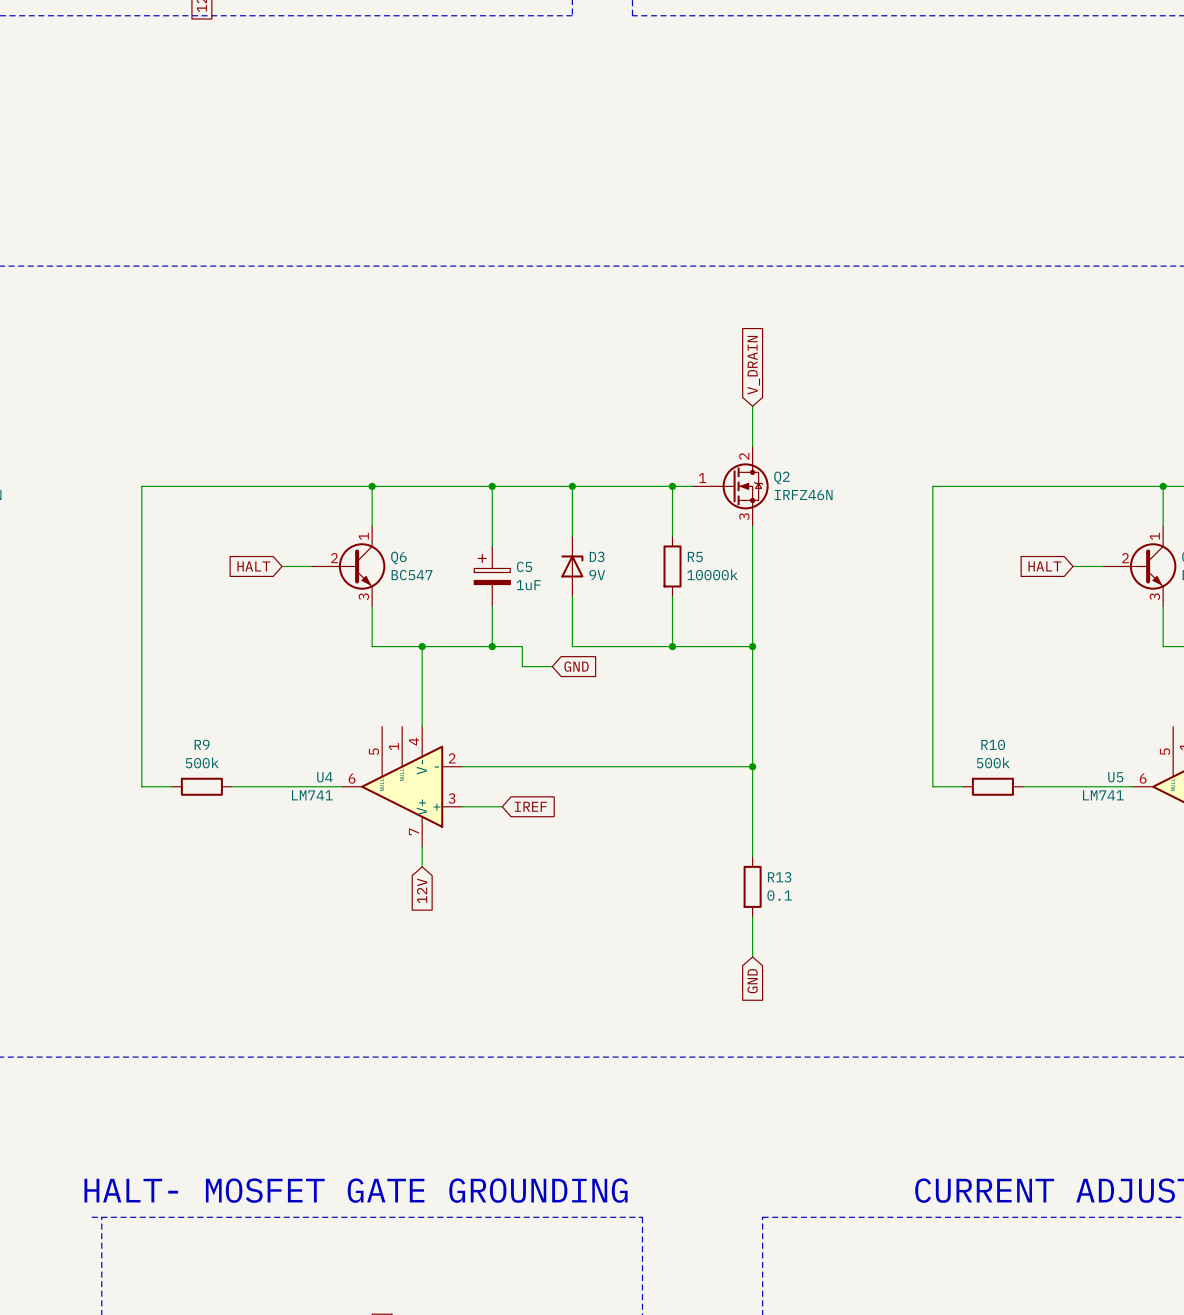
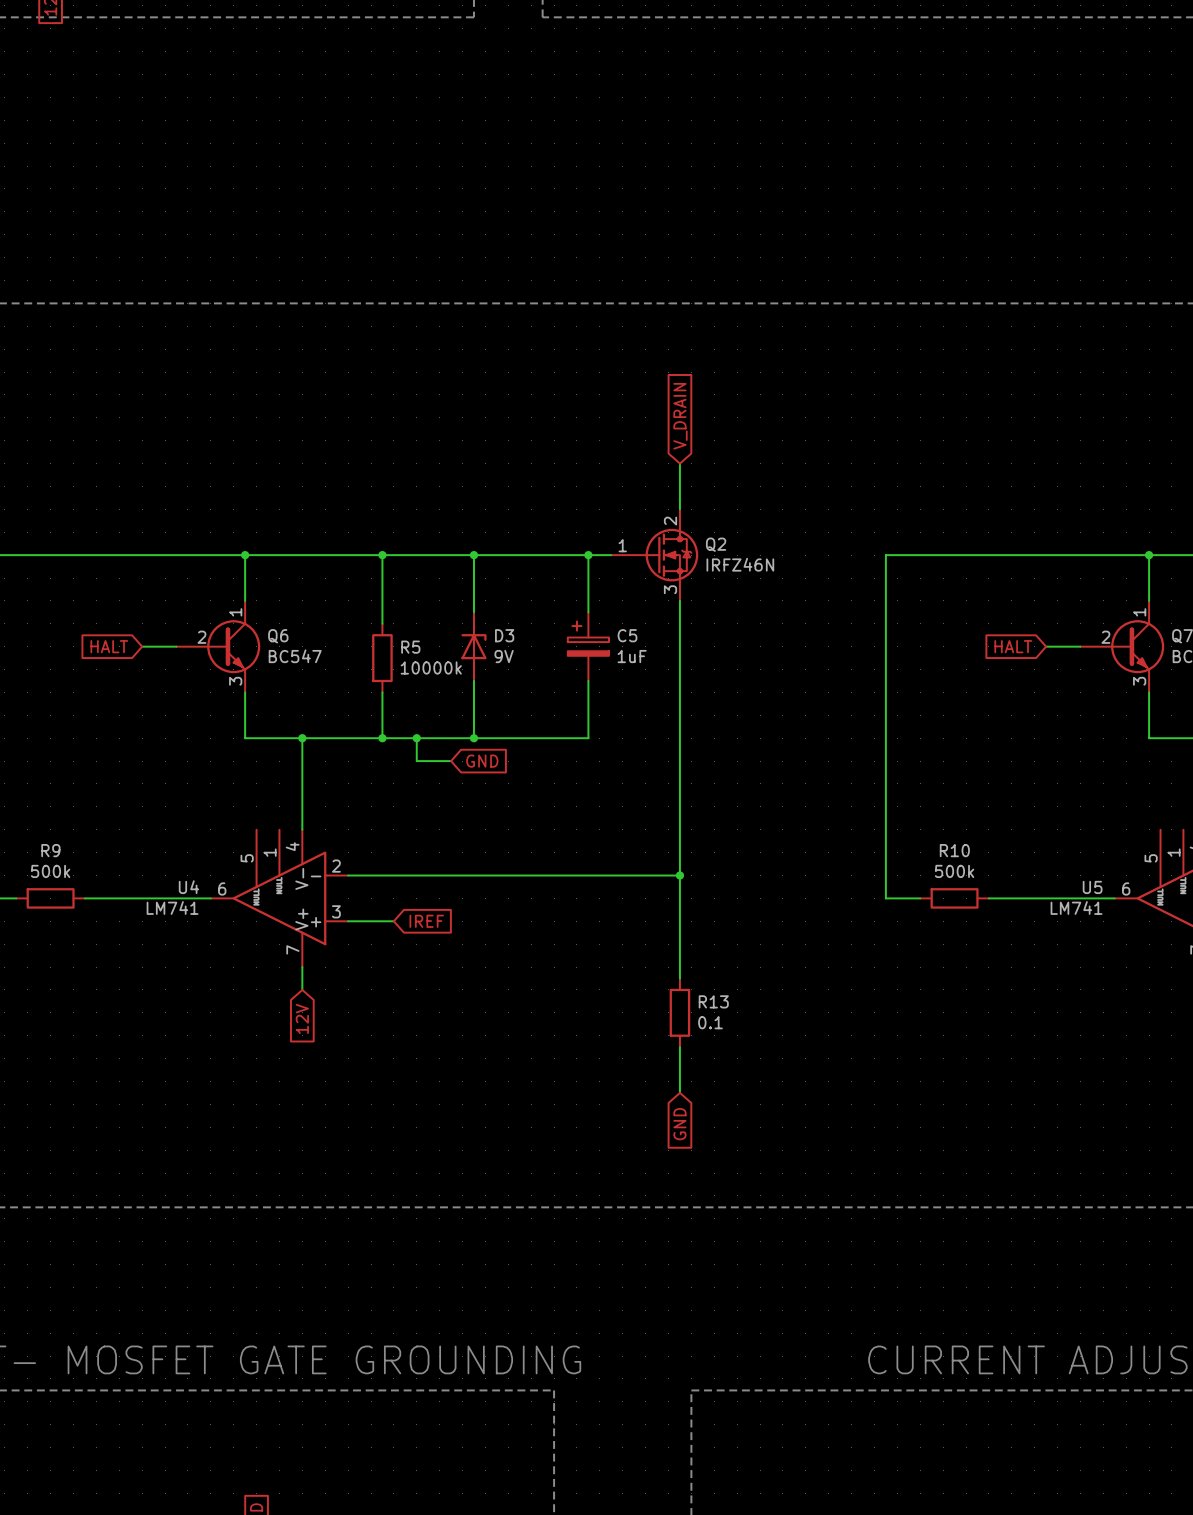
R5 position: (672, 566) -> (382, 658)
C5 position: (492, 576) -> (588, 646)
wire: none -> (416, 738) (473, 738)
junction: none -> (416, 738)
junction: none -> (473, 738)
wire: (672, 646) (752, 646) -> none
junction: (672, 646) -> none
junction: (752, 646) -> none

